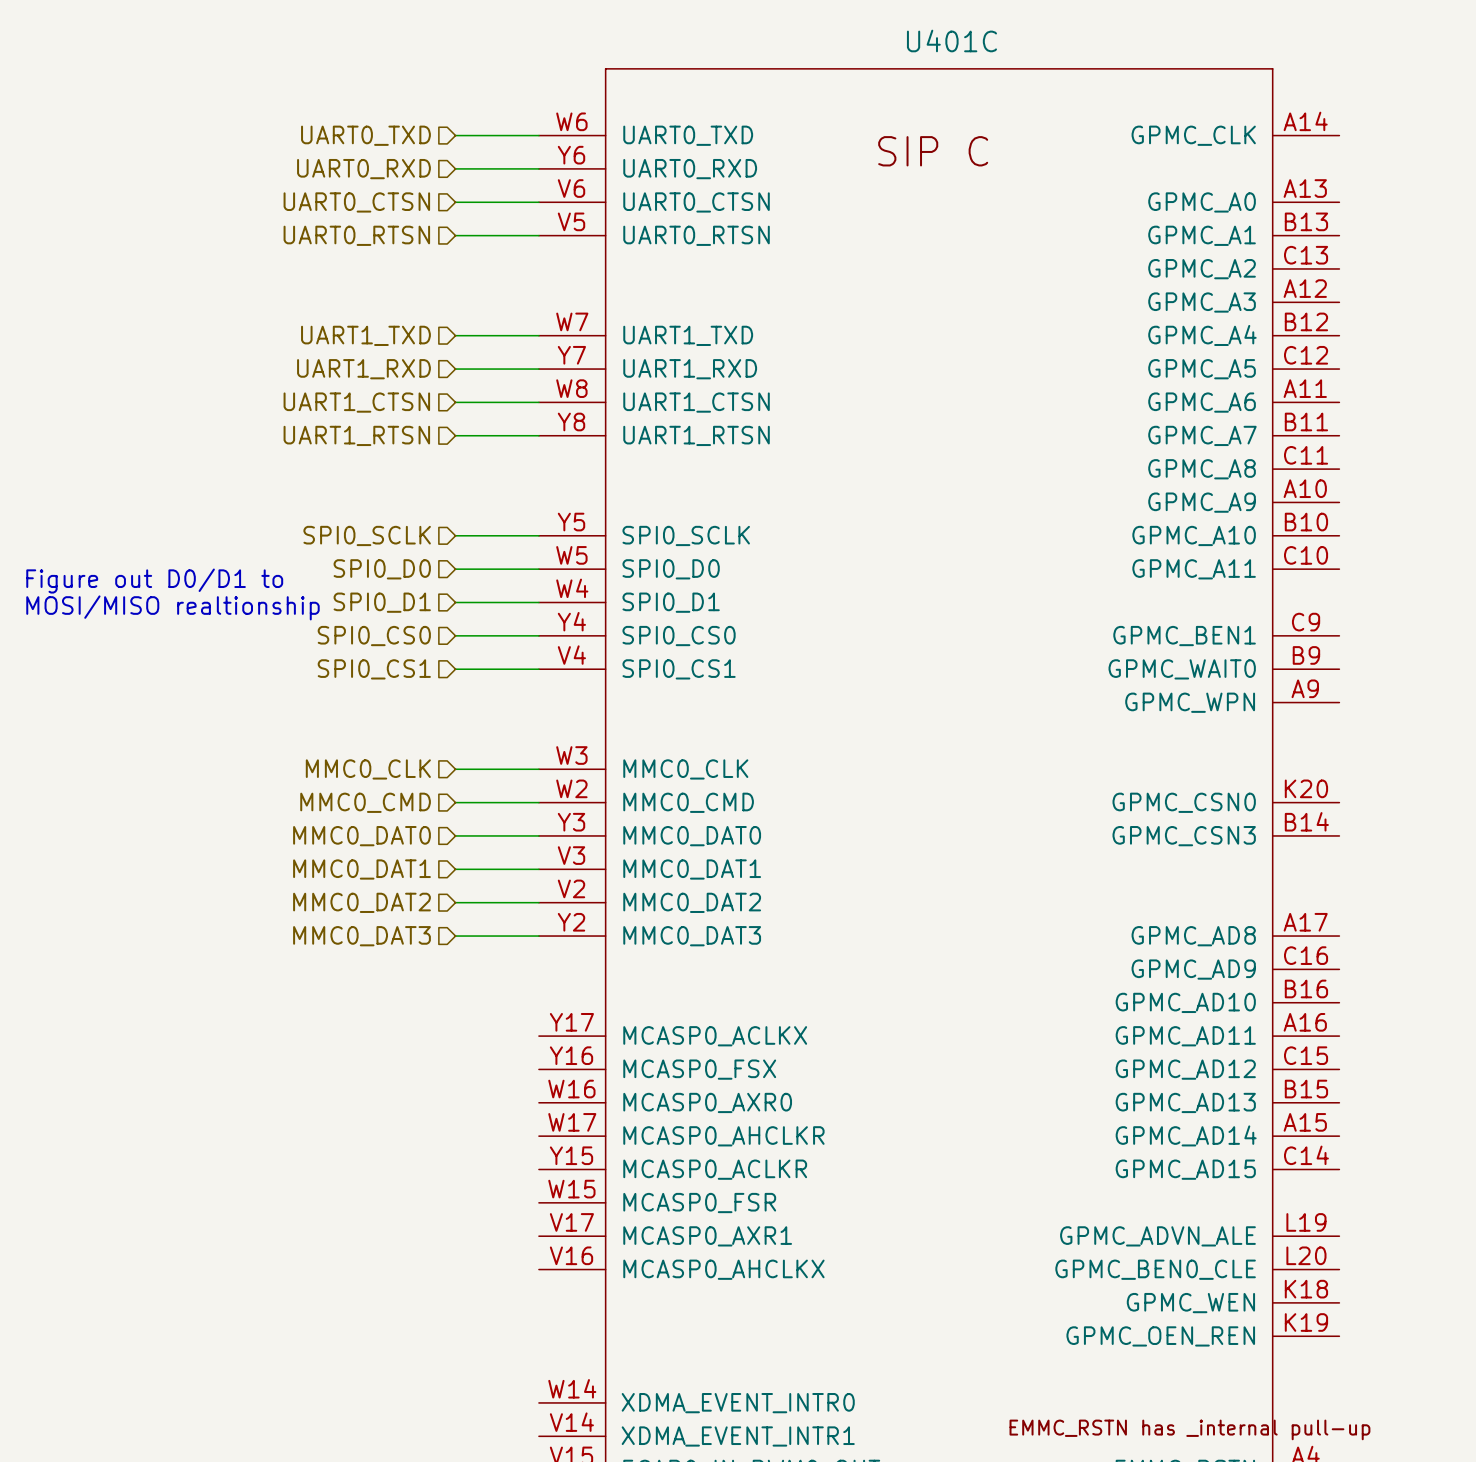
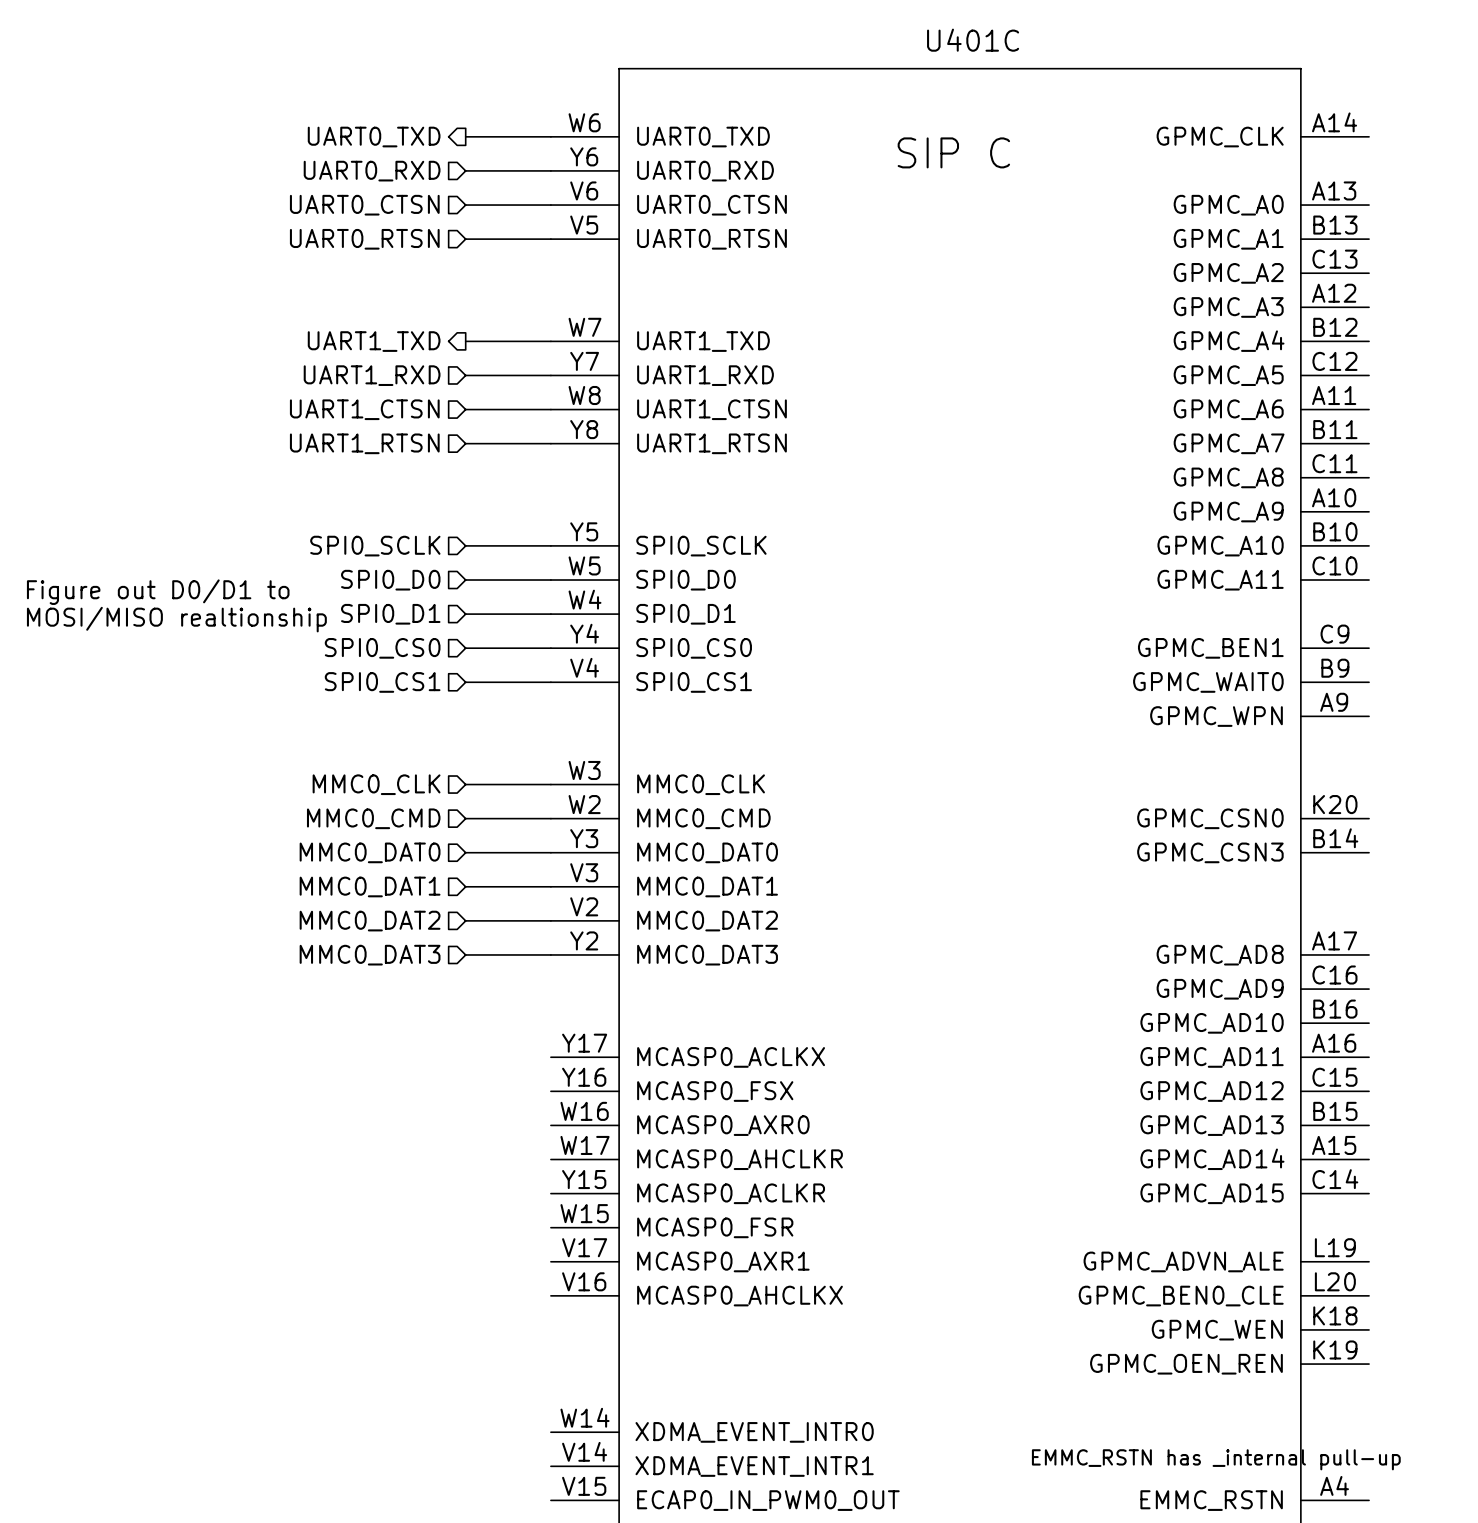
hierarchical label shape: input (365, 135) -> output (374, 137)
hierarchical label shape: input (365, 335) -> output (374, 341)

